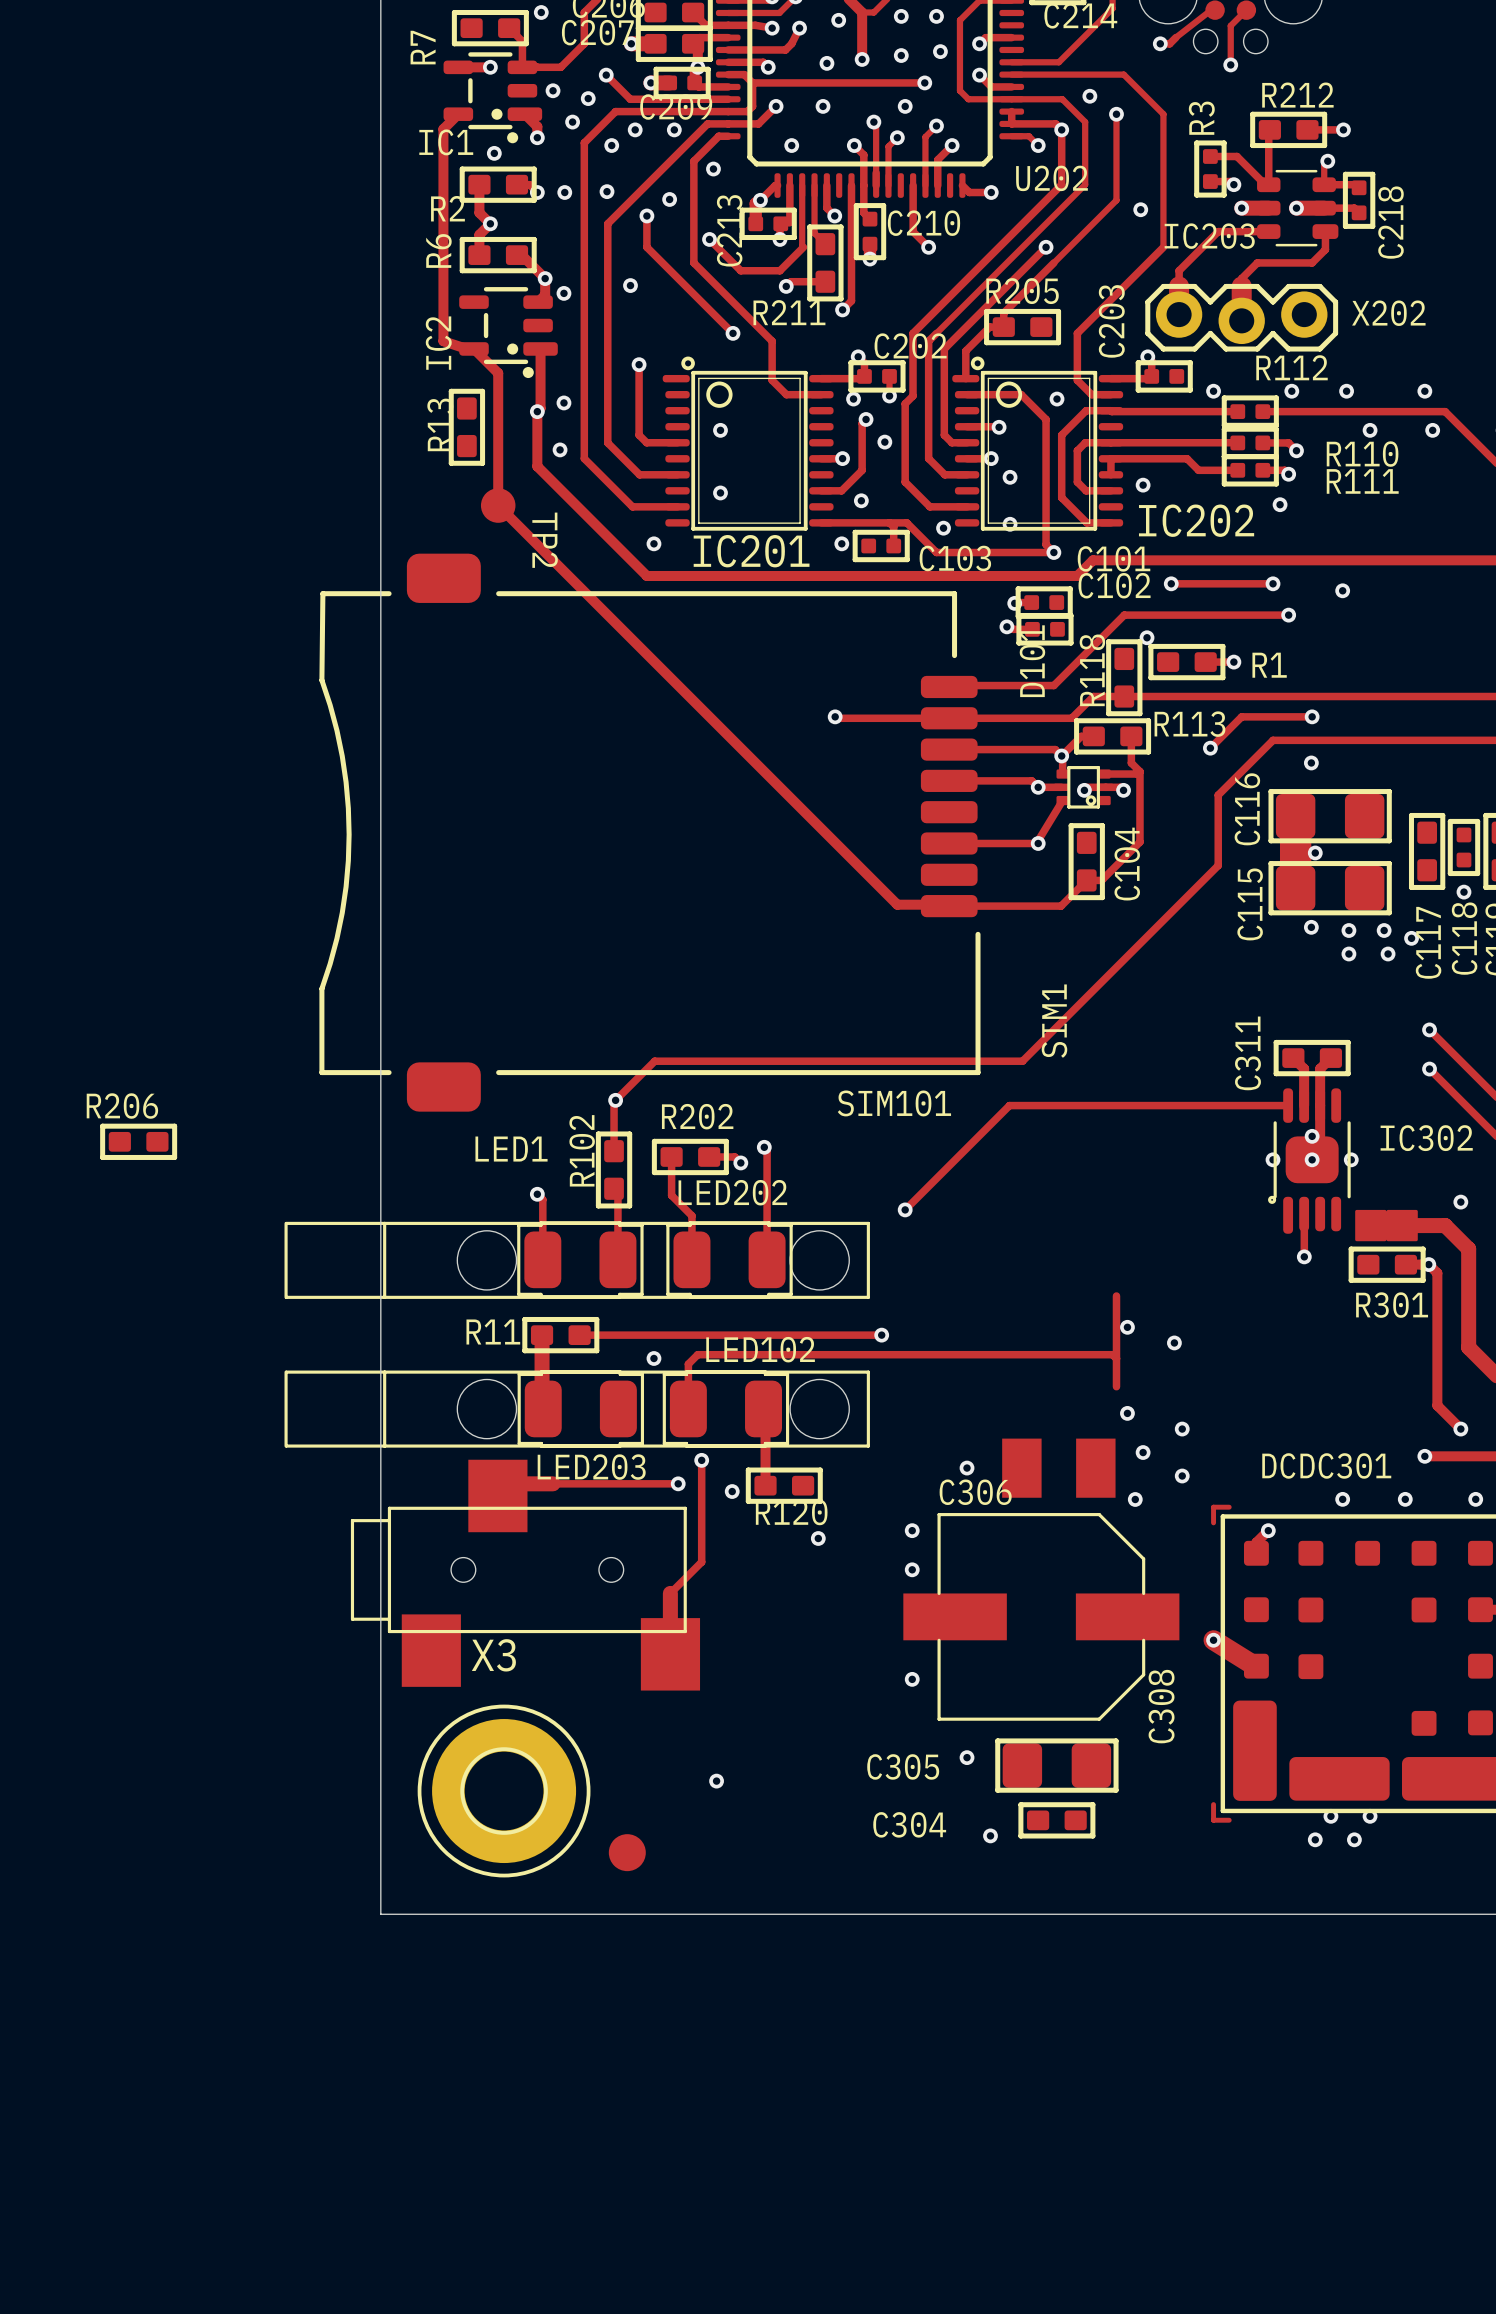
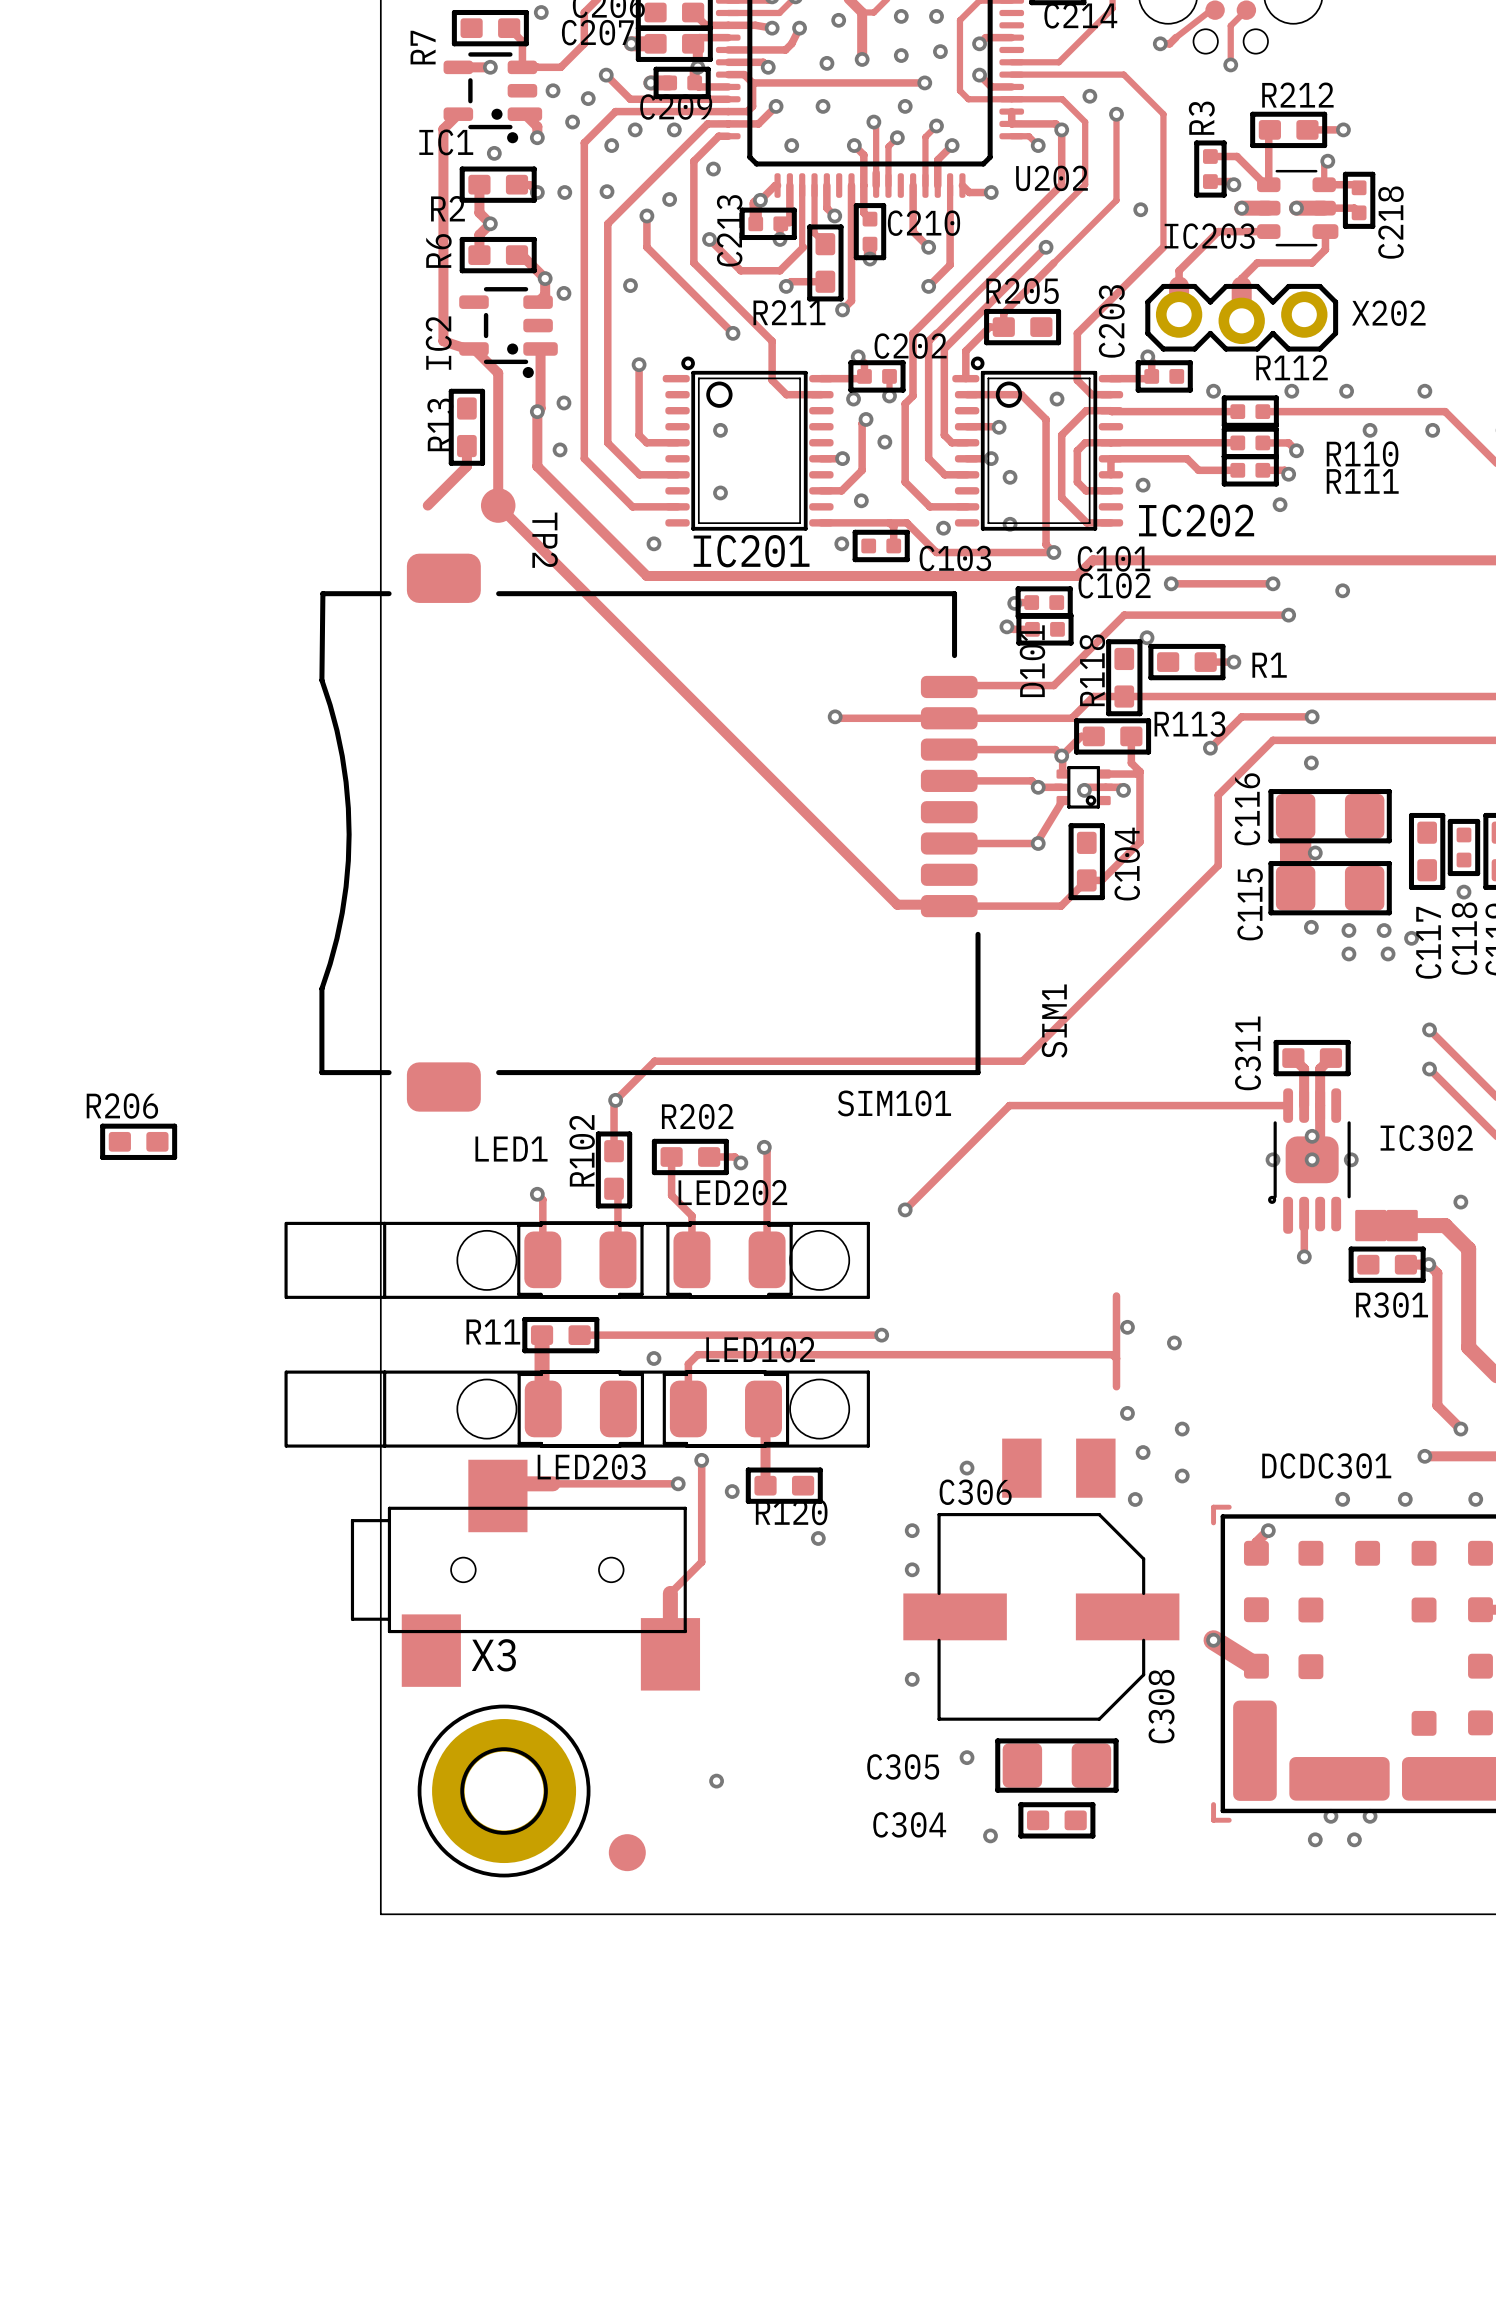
track: none -> (950, 185) (950, 264) (928, 286)
via: none -> (928, 286)
track: none -> (466, 446) (466, 466) (427, 505)

